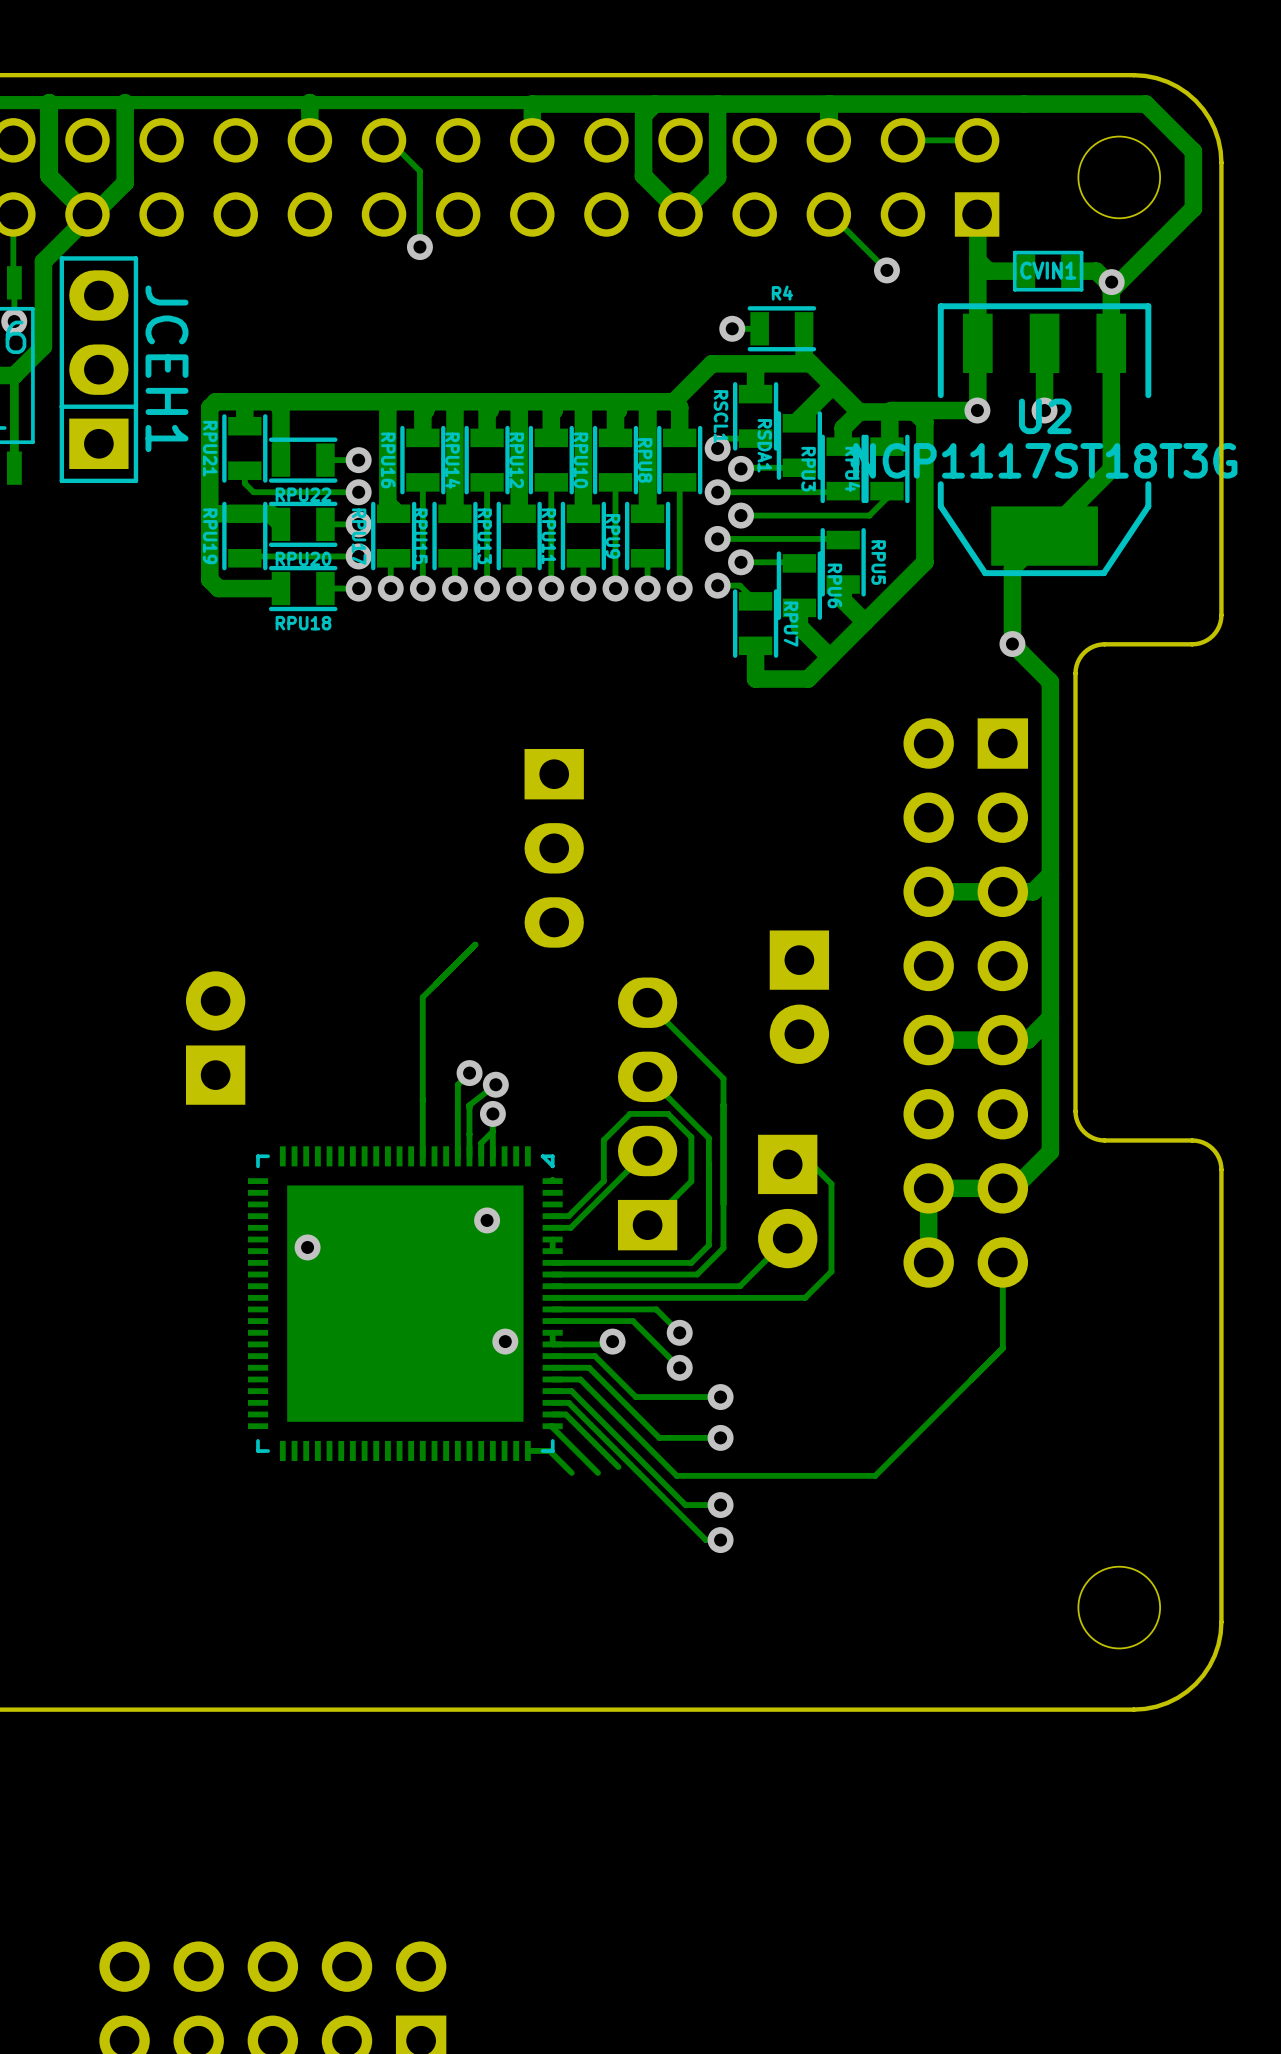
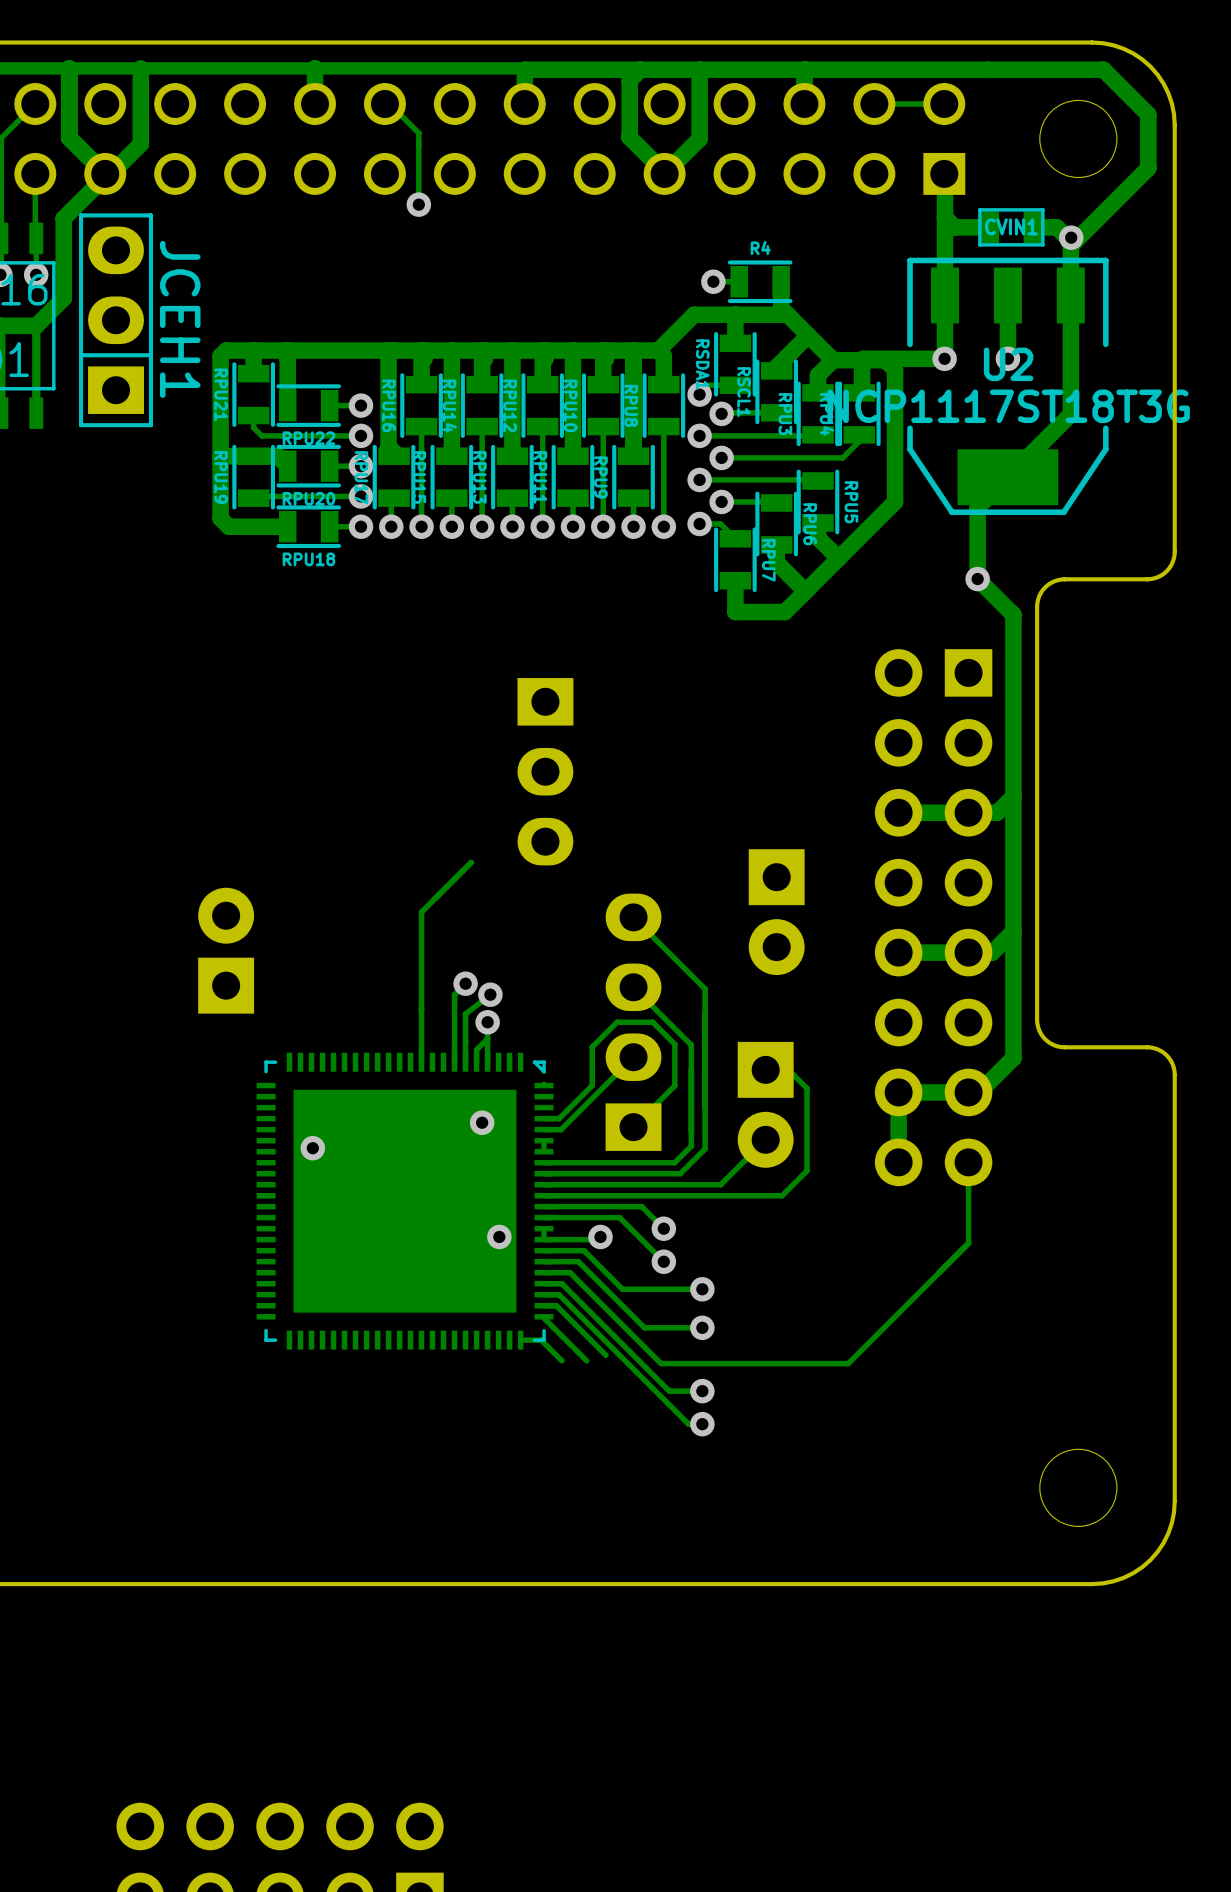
track: (828, 214) (831, 214) (886, 270) -> none
via: (886, 270) -> none
RSCL1 name: RSCL1 (721, 416) -> RSDA1 (702, 364)
RSDA1 name: RSDA1 (764, 445) -> RSCL1 (744, 392)

